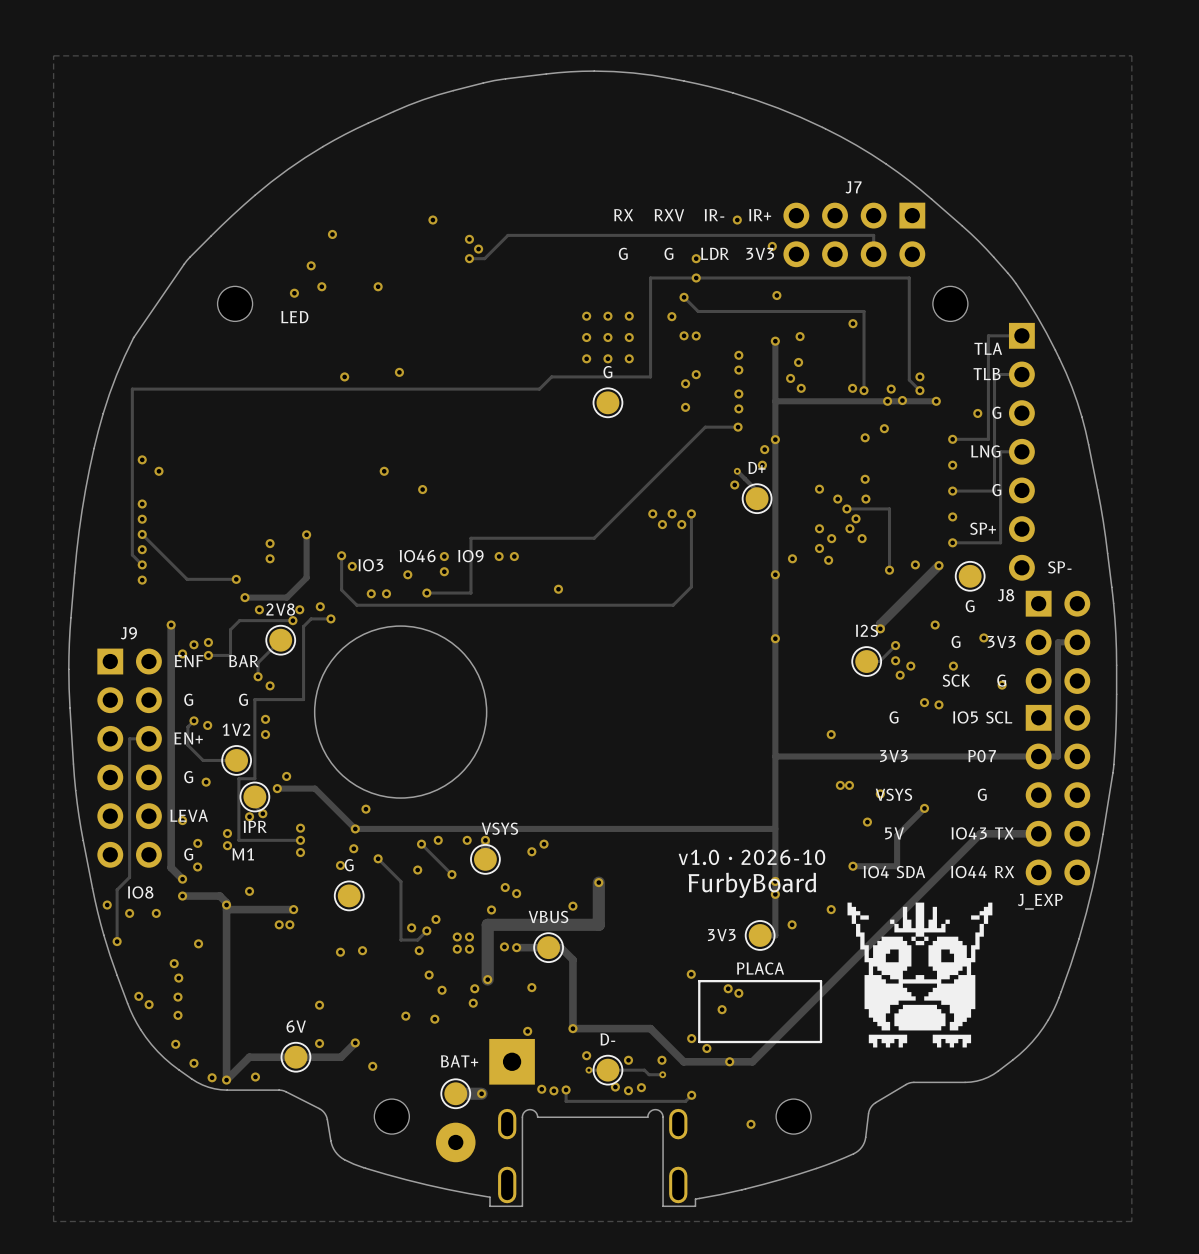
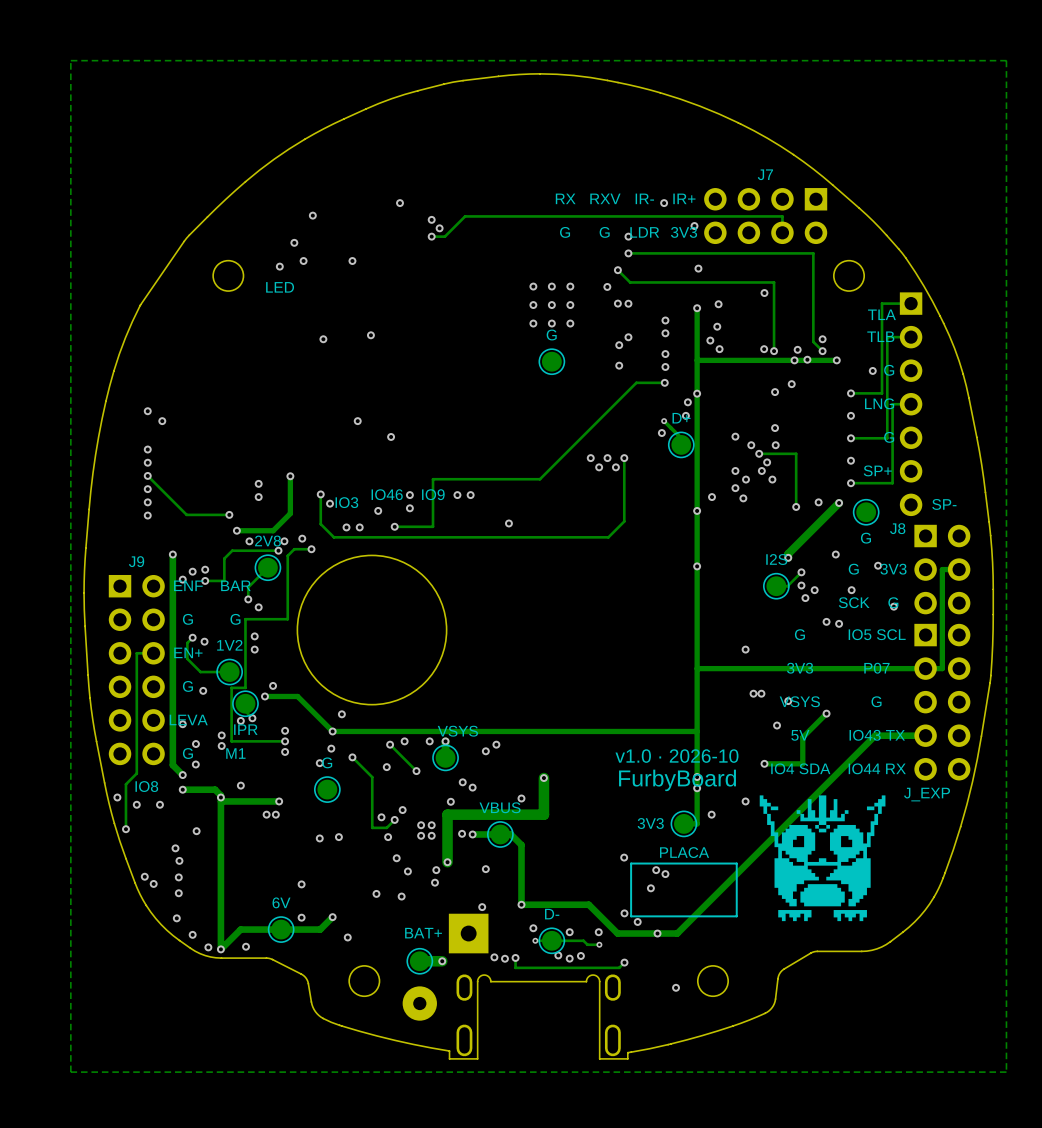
track: (696, 278) (650, 278) (650, 376) (551, 376) (539, 389) (132, 389) (132, 554) (142, 564) -> none

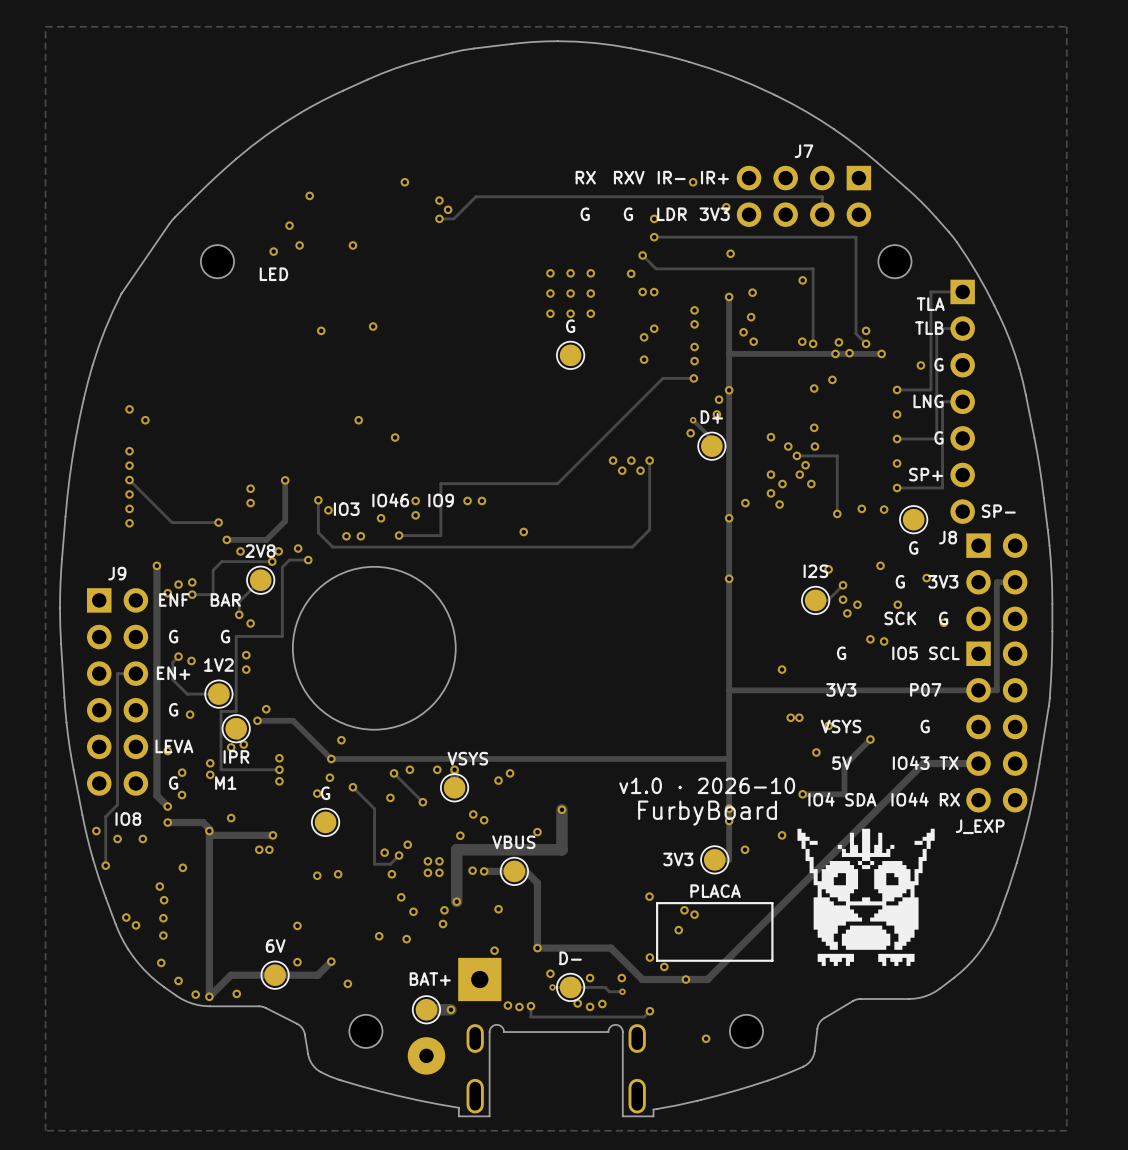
track: (839, 503) (788, 553) (788, 557) -> none

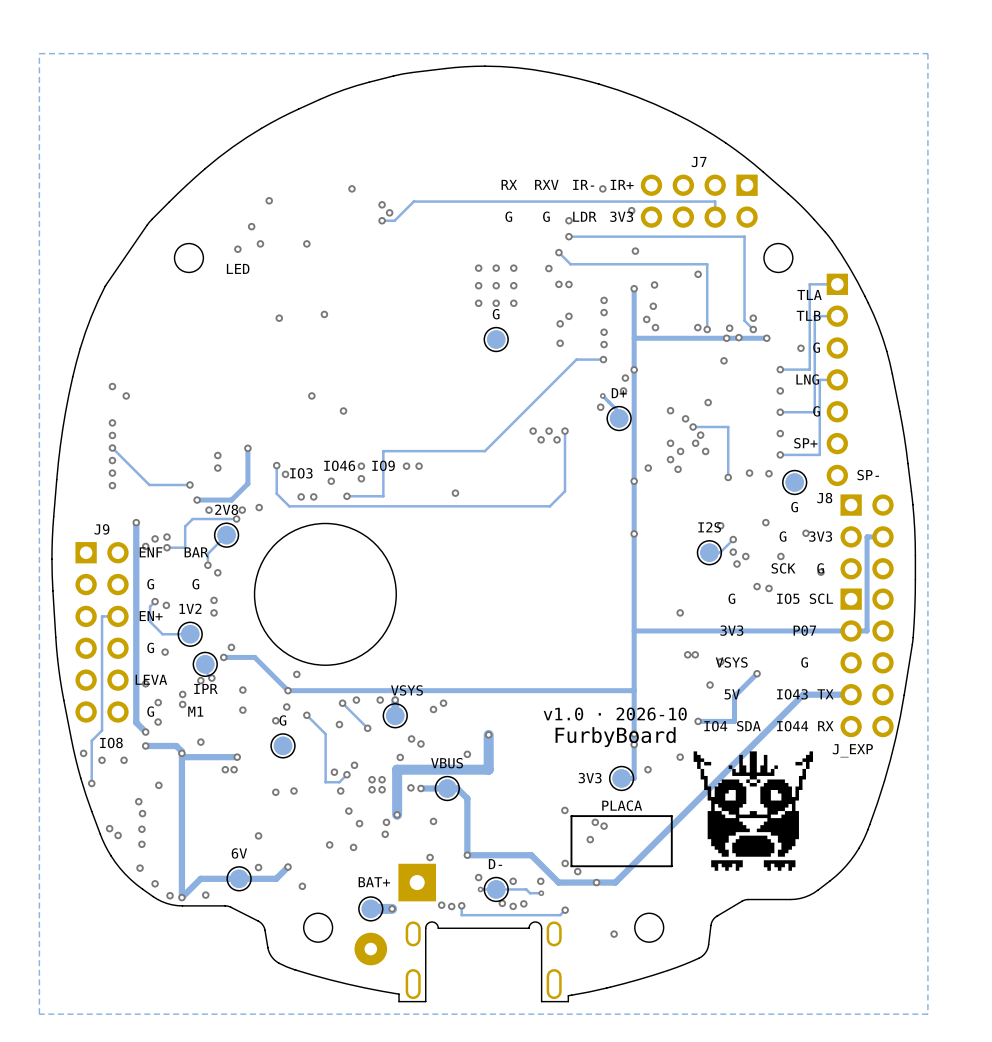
via: (814, 388) -> none
via: (814, 446) -> none
track: (308, 560) (289, 560) (282, 567) (282, 636) (236, 636) (236, 711) (221, 711) (221, 769) (279, 769) -> none
via: (308, 560) -> none
via: (279, 769) -> none

